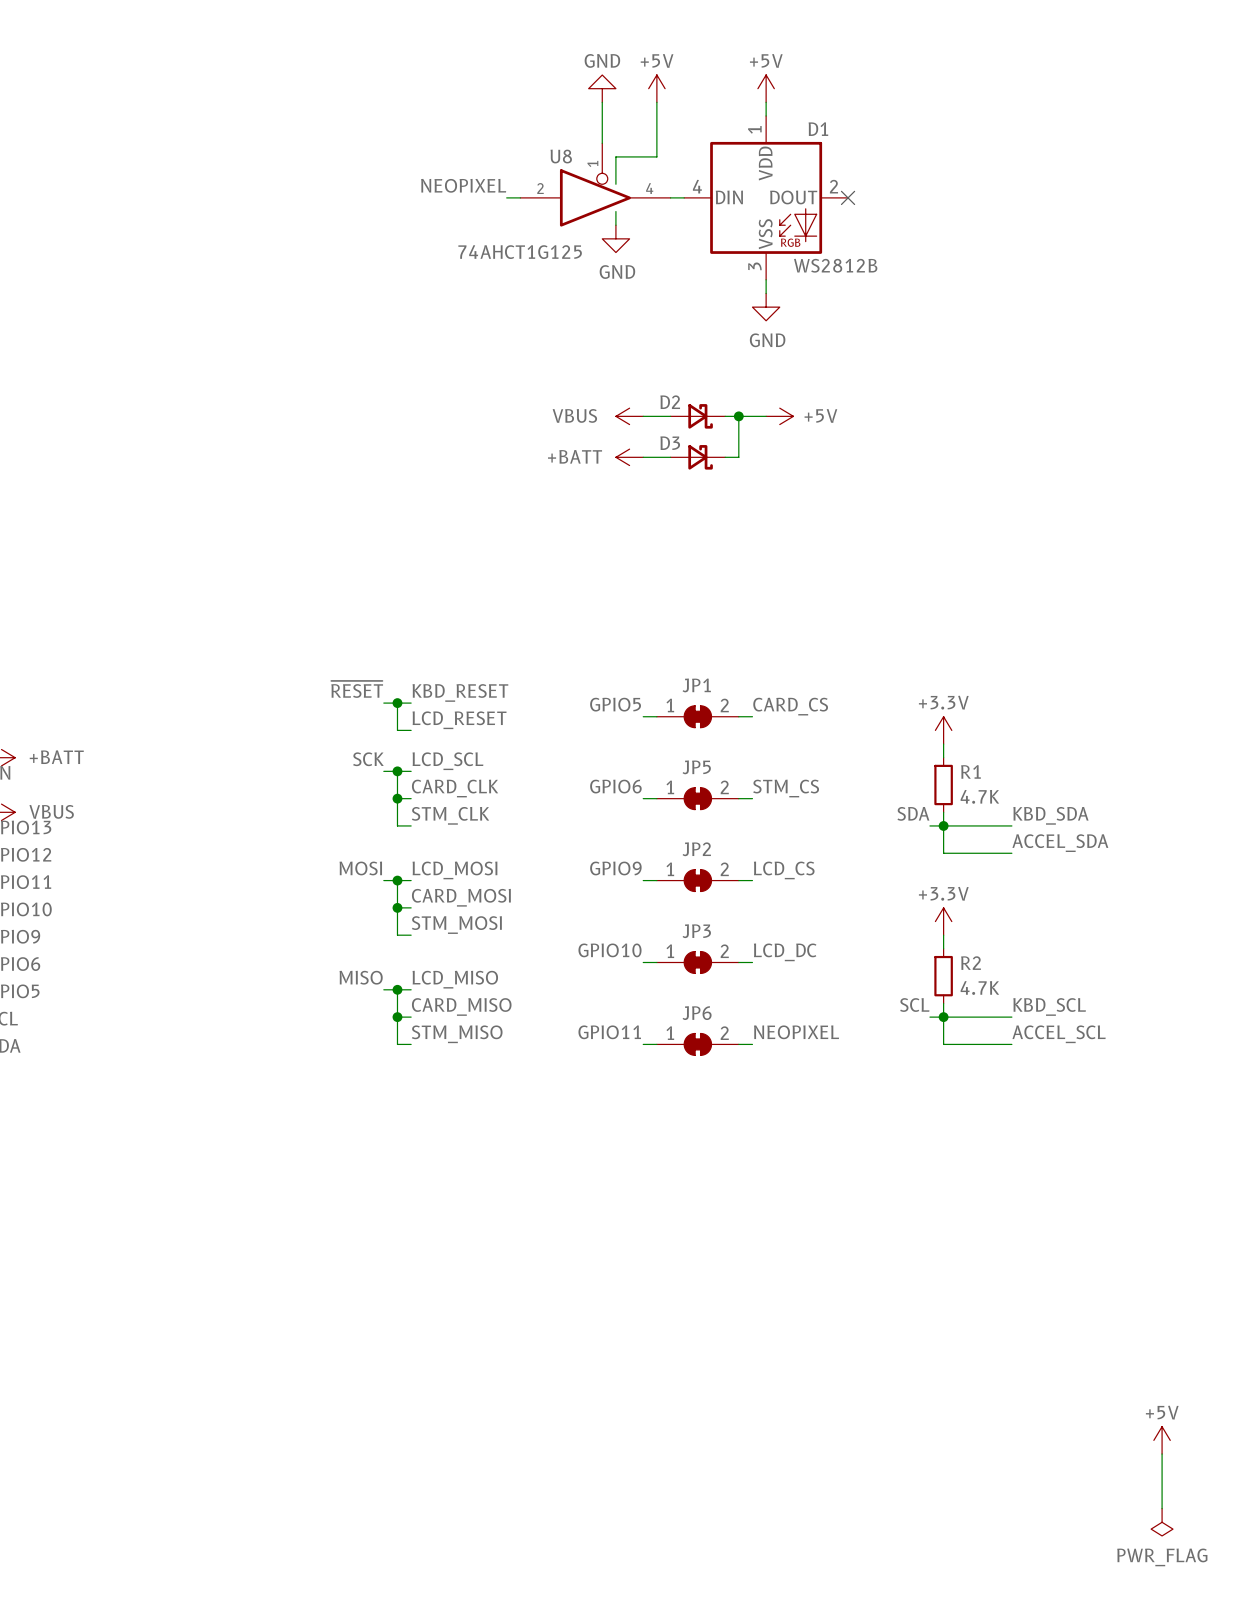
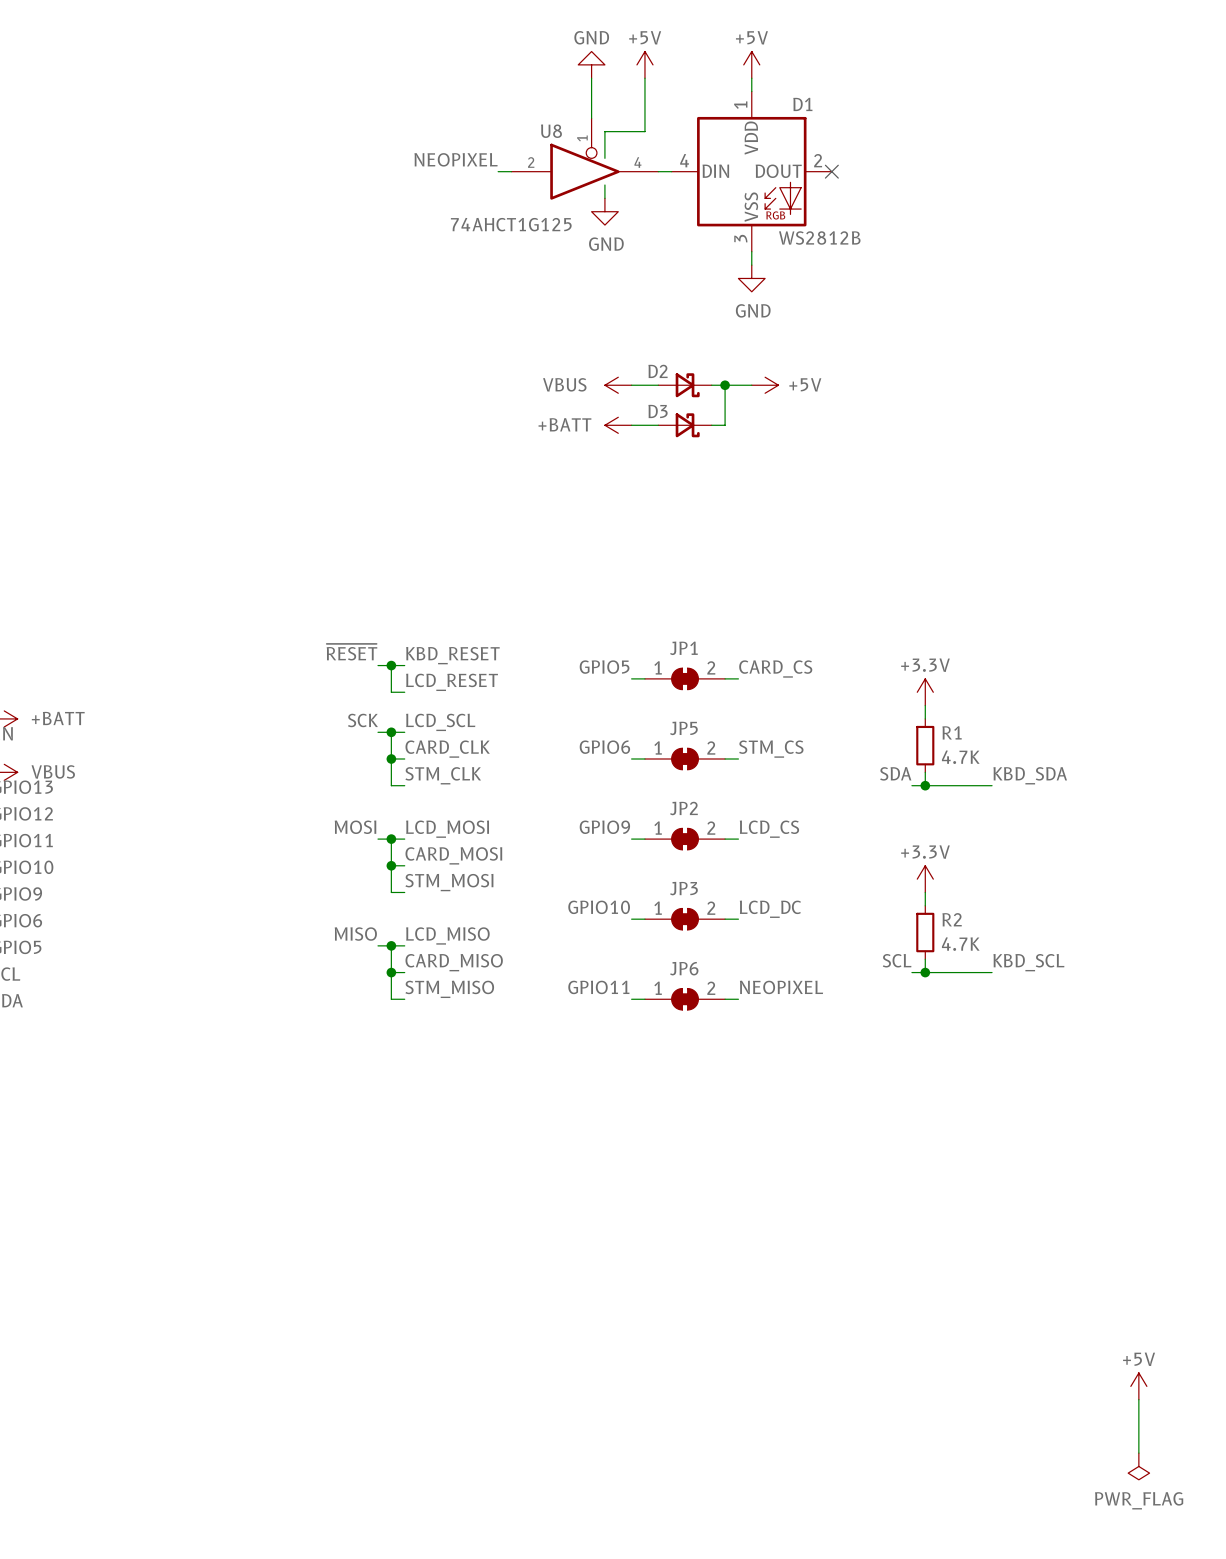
wire: (943, 825) (943, 853) (1011, 853) -> none
label: ACCEL_SDA (1060, 843) -> none
wire: (943, 1017) (943, 1044) (1011, 1044) -> none
label: ACCEL_SCL (1059, 1034) -> none

